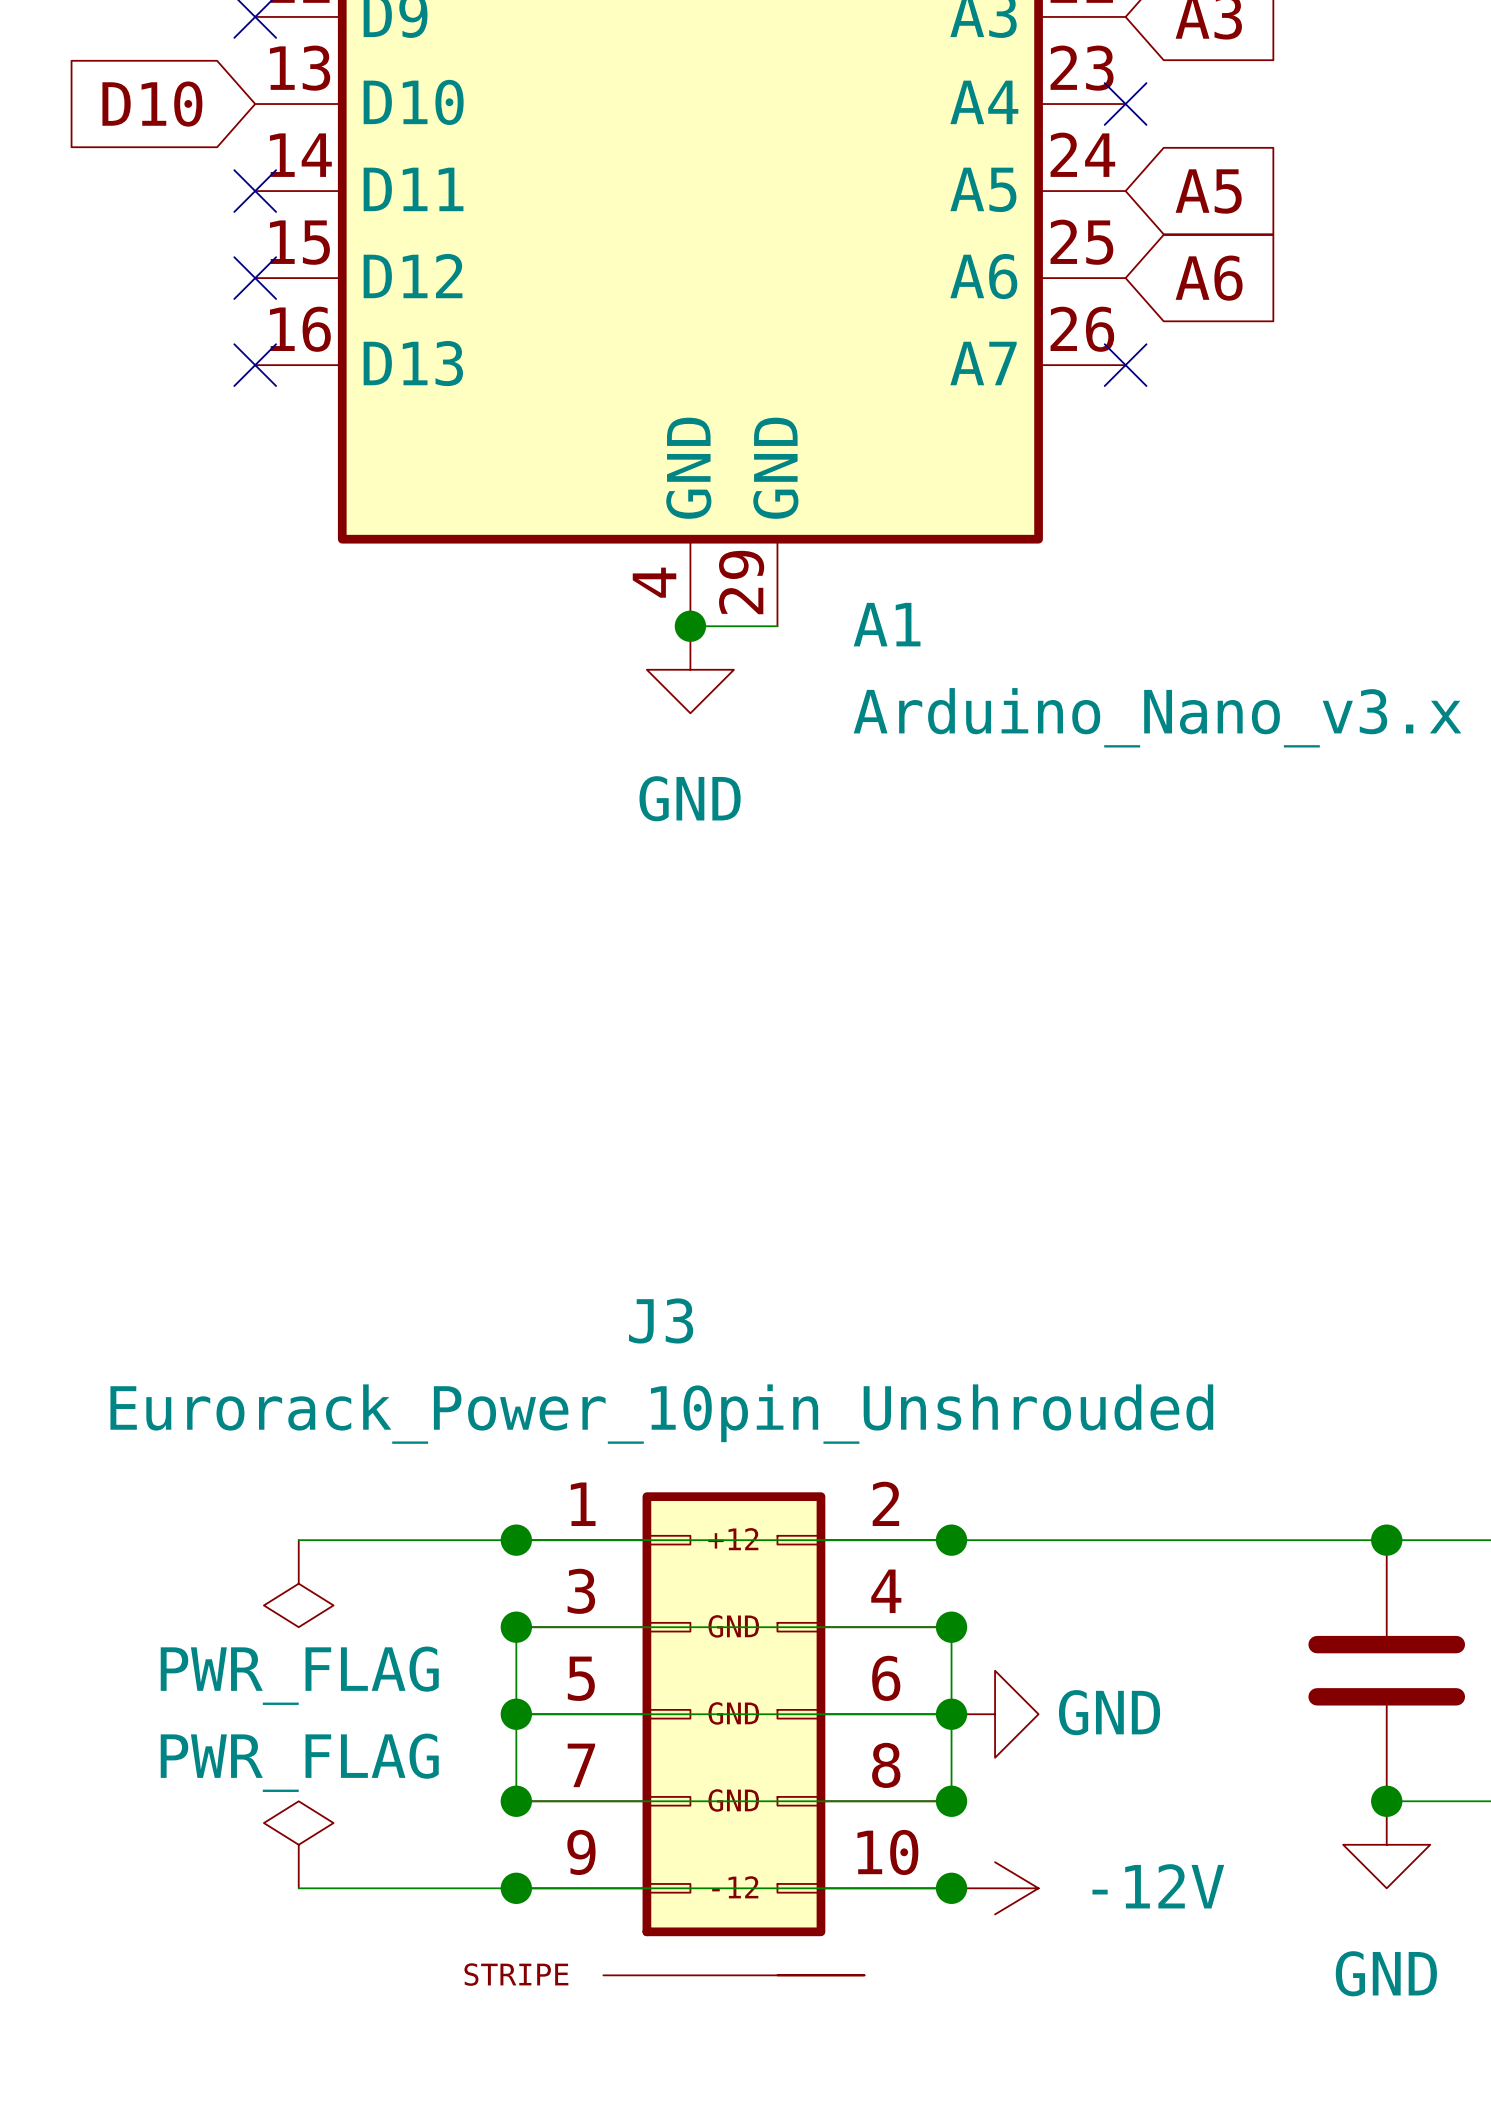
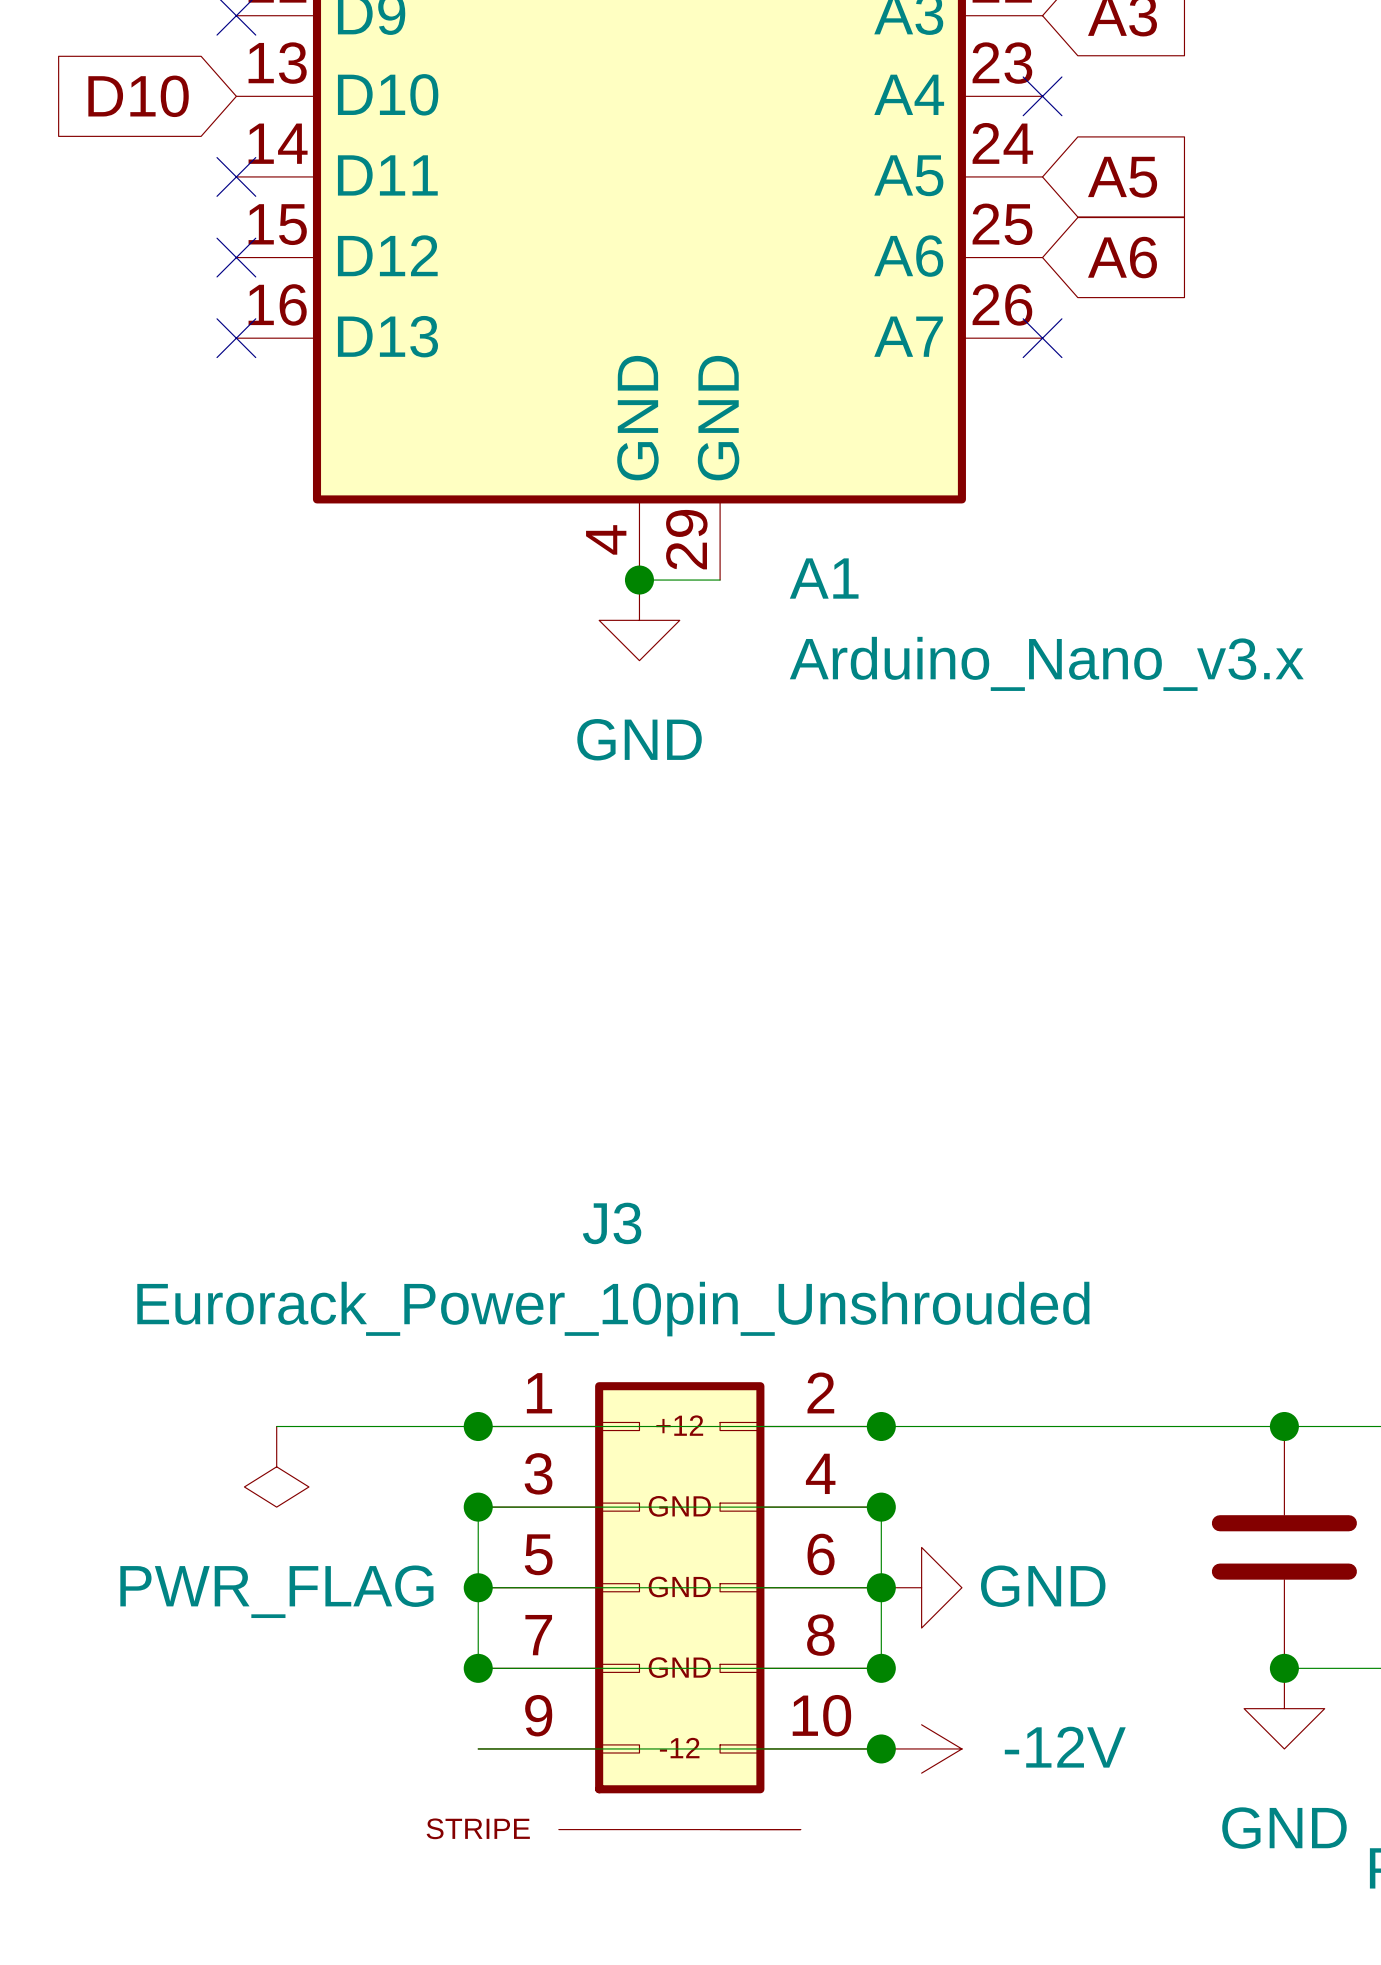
power symbol text position: PWR_FLAG (299, 1762) -> PWR_FLAG (276, 1591)
power symbol: PWR_FLAG (298, 1844) -> none
wire: (298, 1888) (516, 1888) -> none
junction: (516, 1888) -> none

